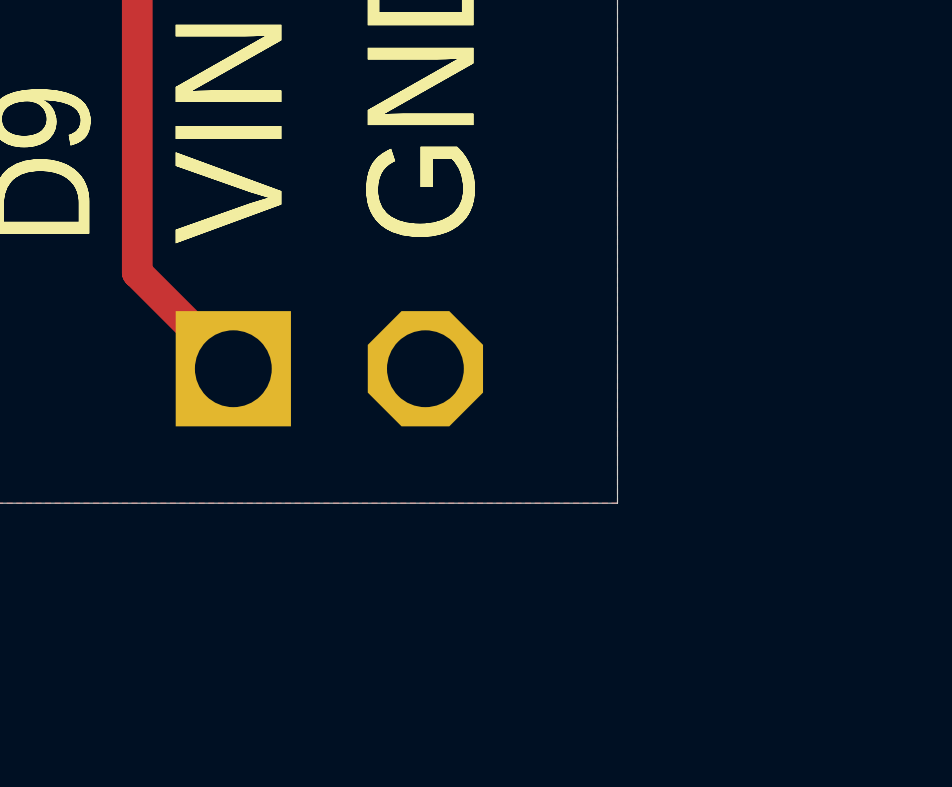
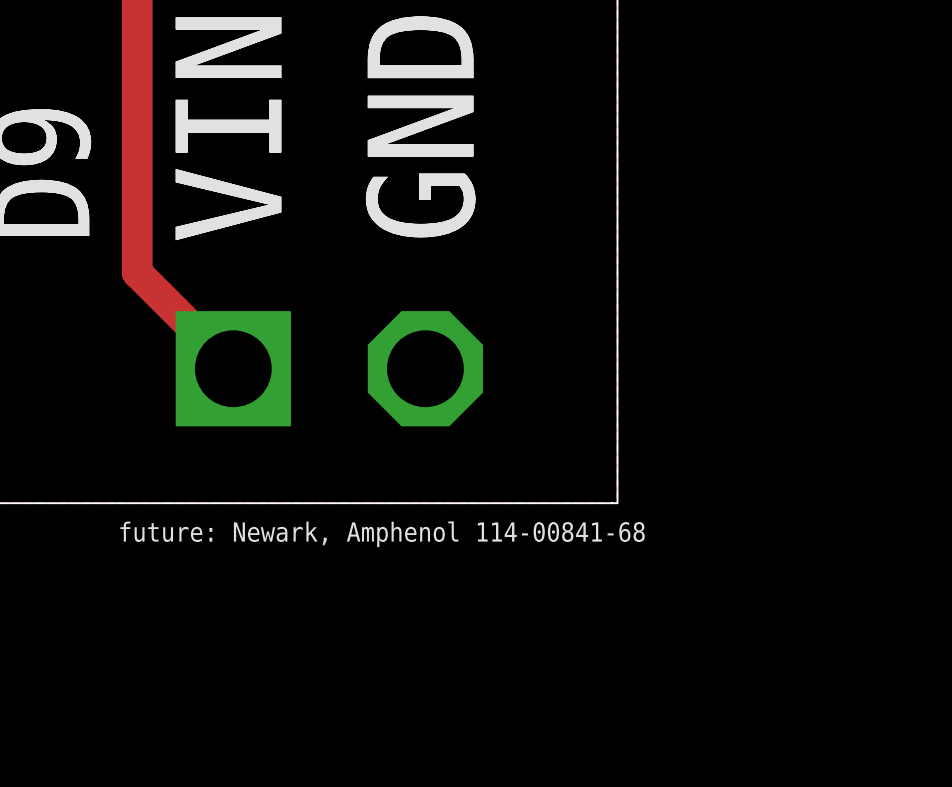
text: none -> future: Newark, Amphenol 114-00841-68 (382, 534)

